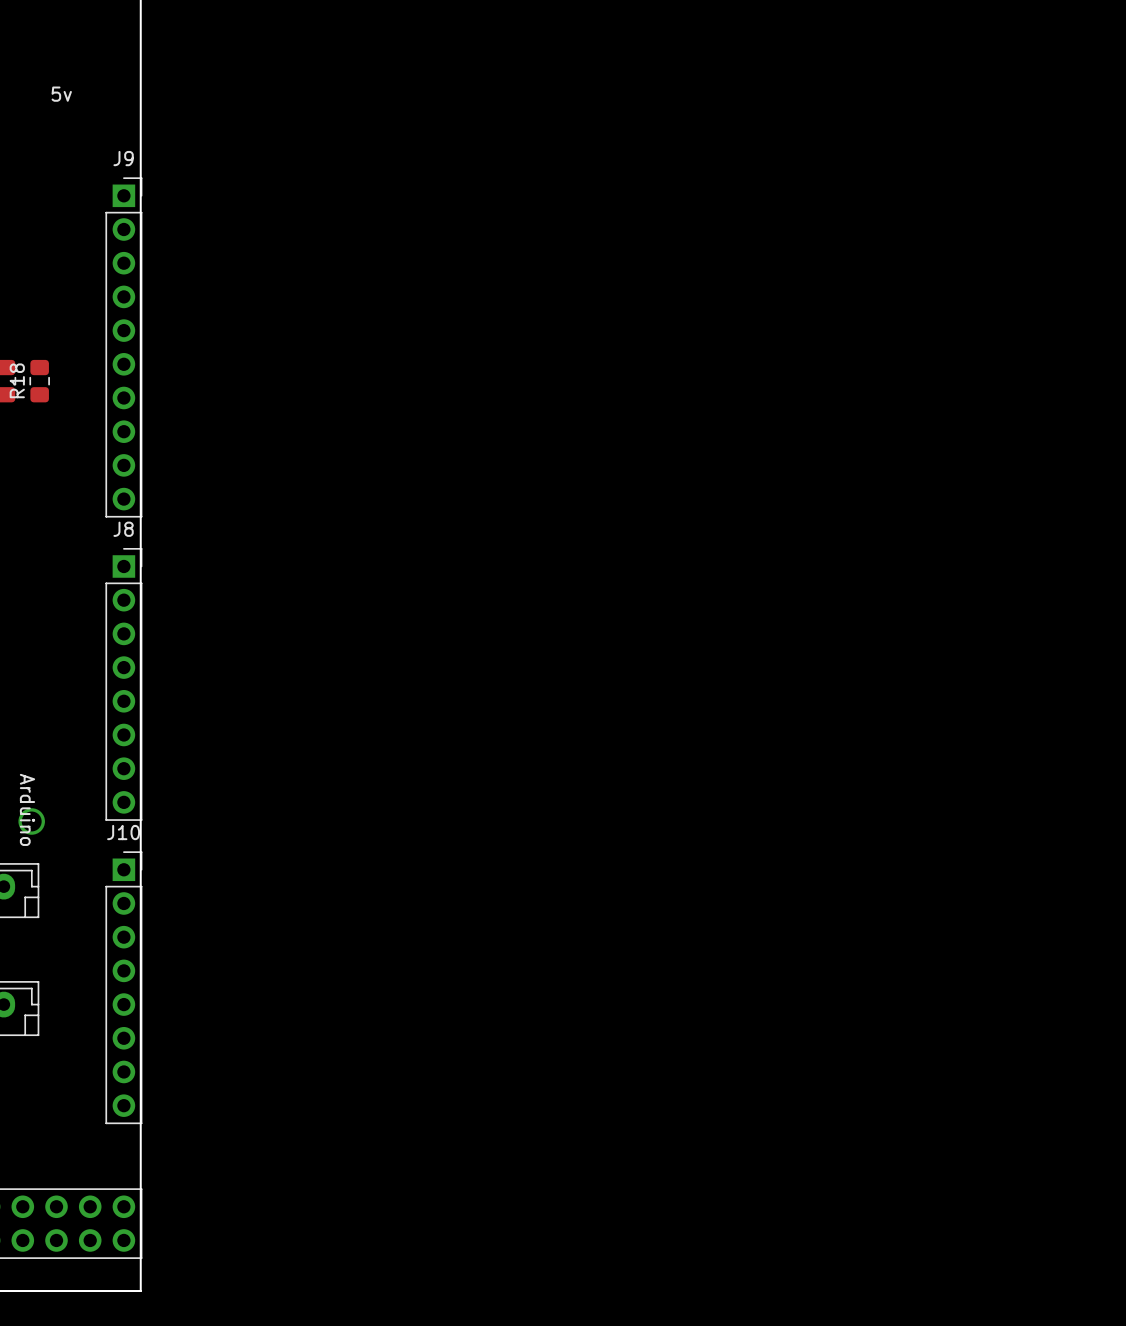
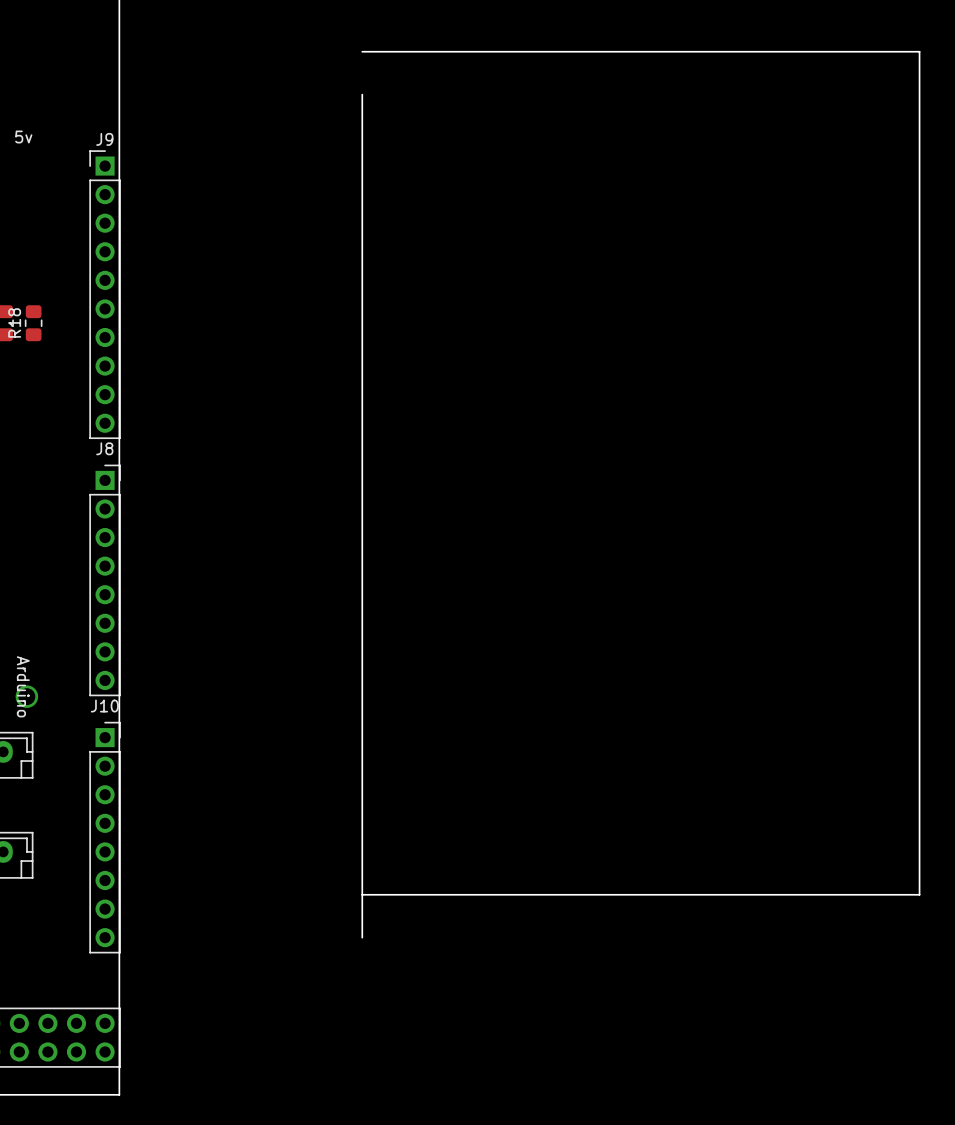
board edge: none -> (362, 51) (919, 51) (919, 894) (362, 894)
text position: 5v (61, 94) -> 5v (23, 136)
board edge: none -> (362, 94) (362, 937)
J9 footprint: [105, 177, 143, 518] -> [89, 150, 121, 439]

